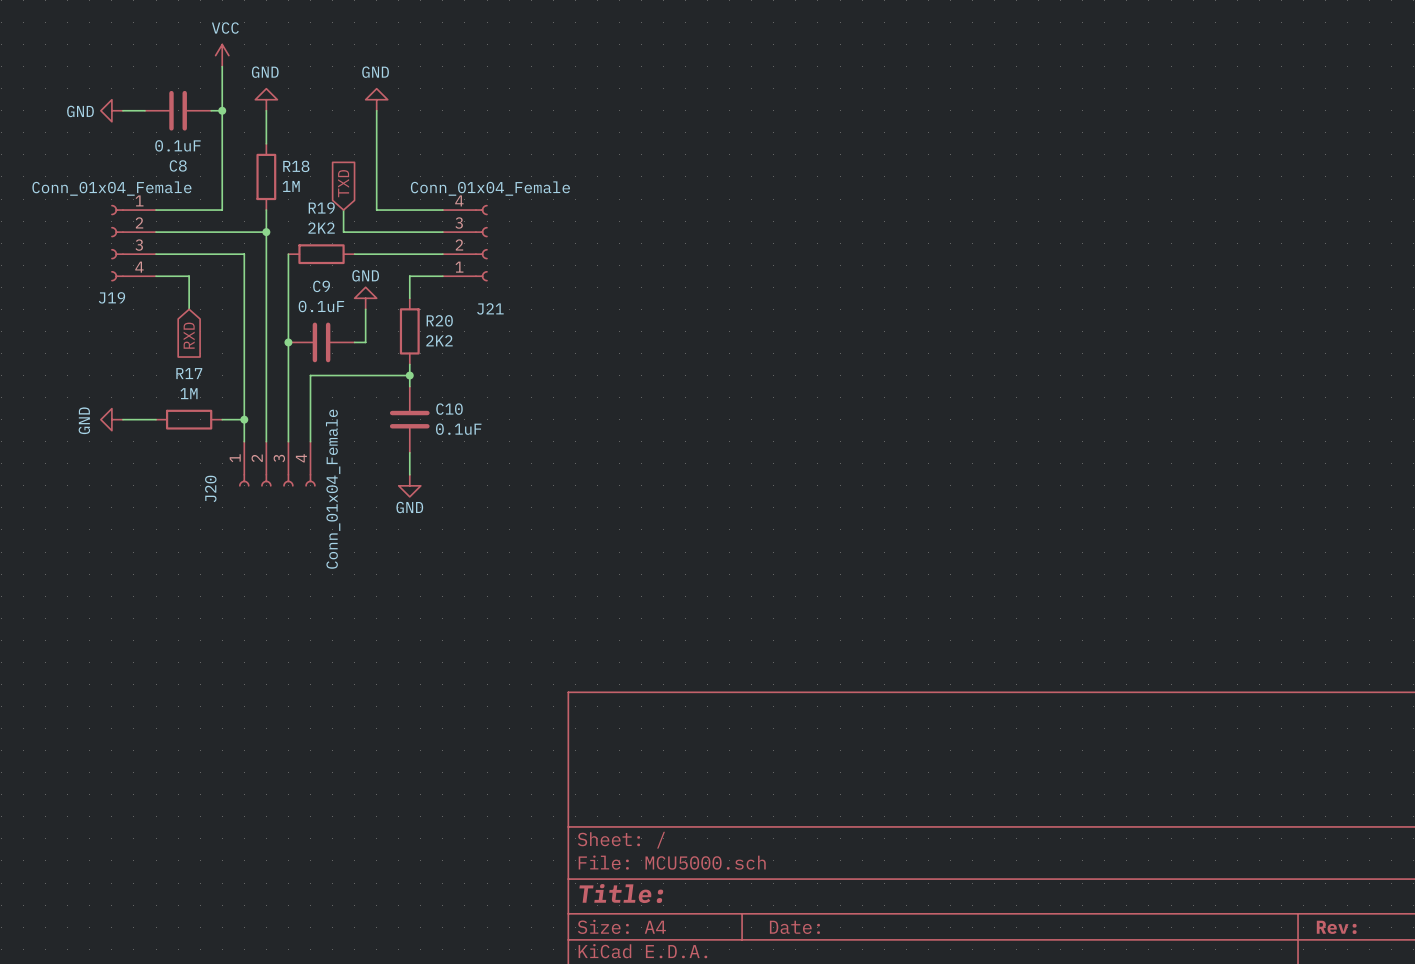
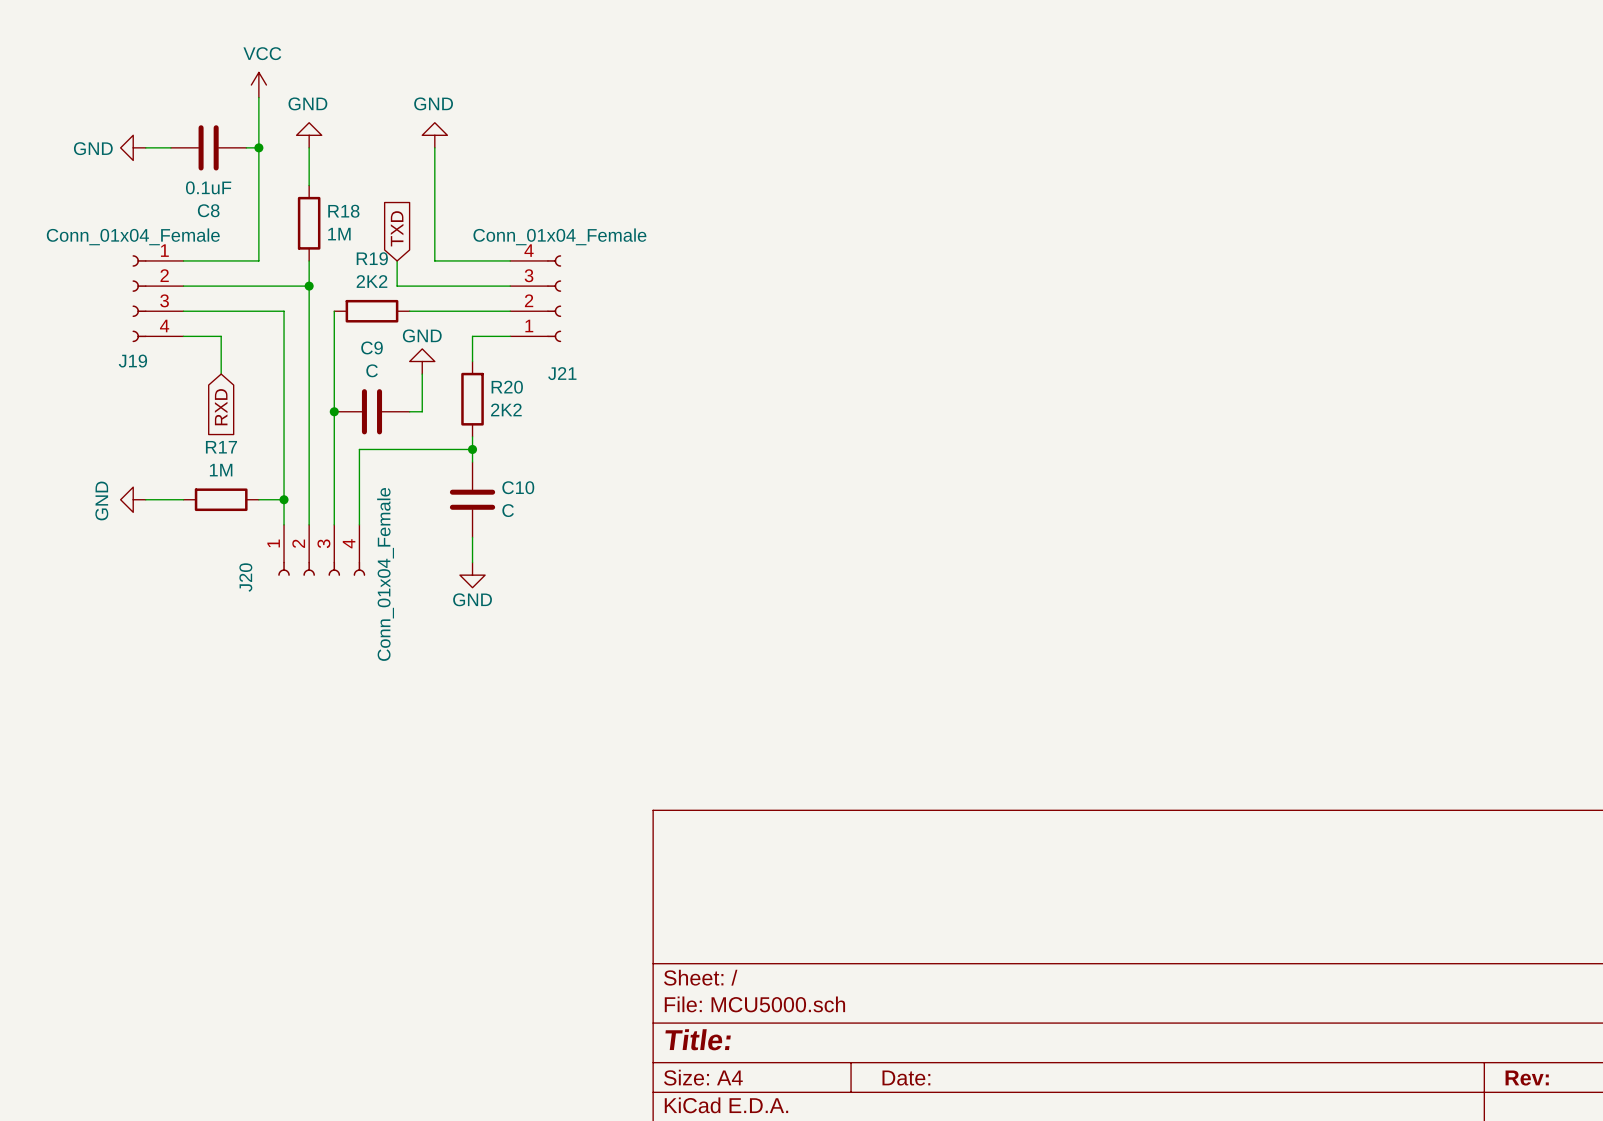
C9 value: 0.1uF (321, 306) -> C (372, 370)
C10 value: 0.1uF (458, 429) -> C (508, 510)

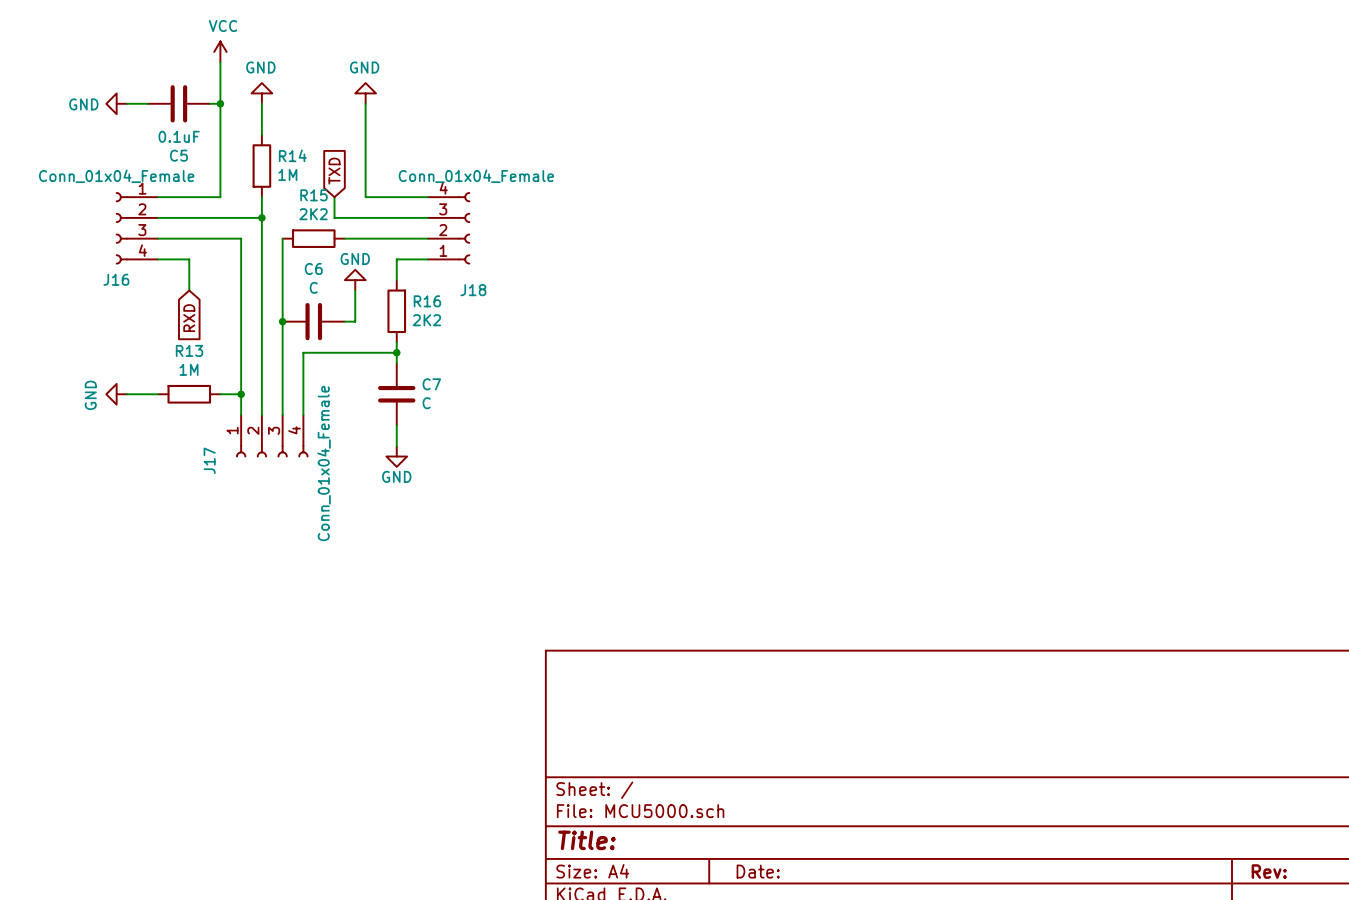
C8 name: C8 (208, 210) -> C5 (178, 155)
R18 name: R18 (343, 211) -> R14 (292, 155)
R19 name: R19 (372, 258) -> R15 (314, 195)
C9 name: C9 (372, 347) -> C6 (313, 268)
J19 name: J19 (132, 361) -> J16 (116, 279)
J21 name: J21 (562, 373) -> J18 (473, 290)
R20 name: R20 (507, 387) -> R16 (427, 301)
R17 name: R17 (221, 447) -> R13 (189, 350)
C10 name: C10 (518, 487) -> C7 (431, 384)
J20 name: J20 (245, 577) -> J17 (209, 460)

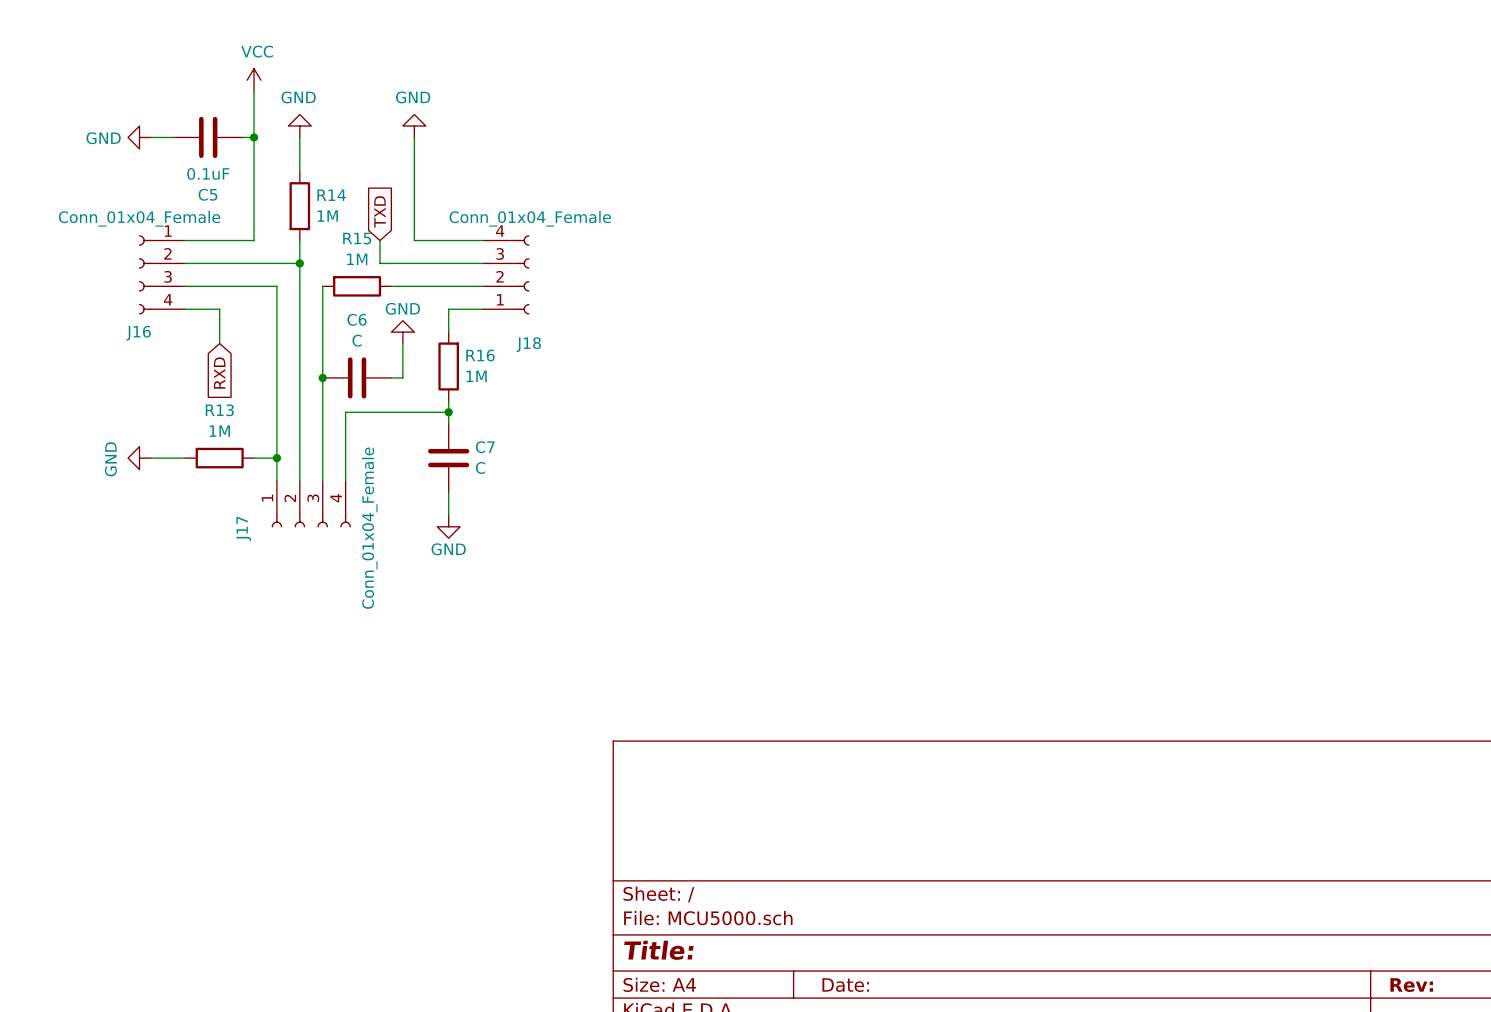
R15 value: 2K2 (313, 214) -> 1M (357, 259)
R16 value: 2K2 (426, 320) -> 1M (476, 376)

